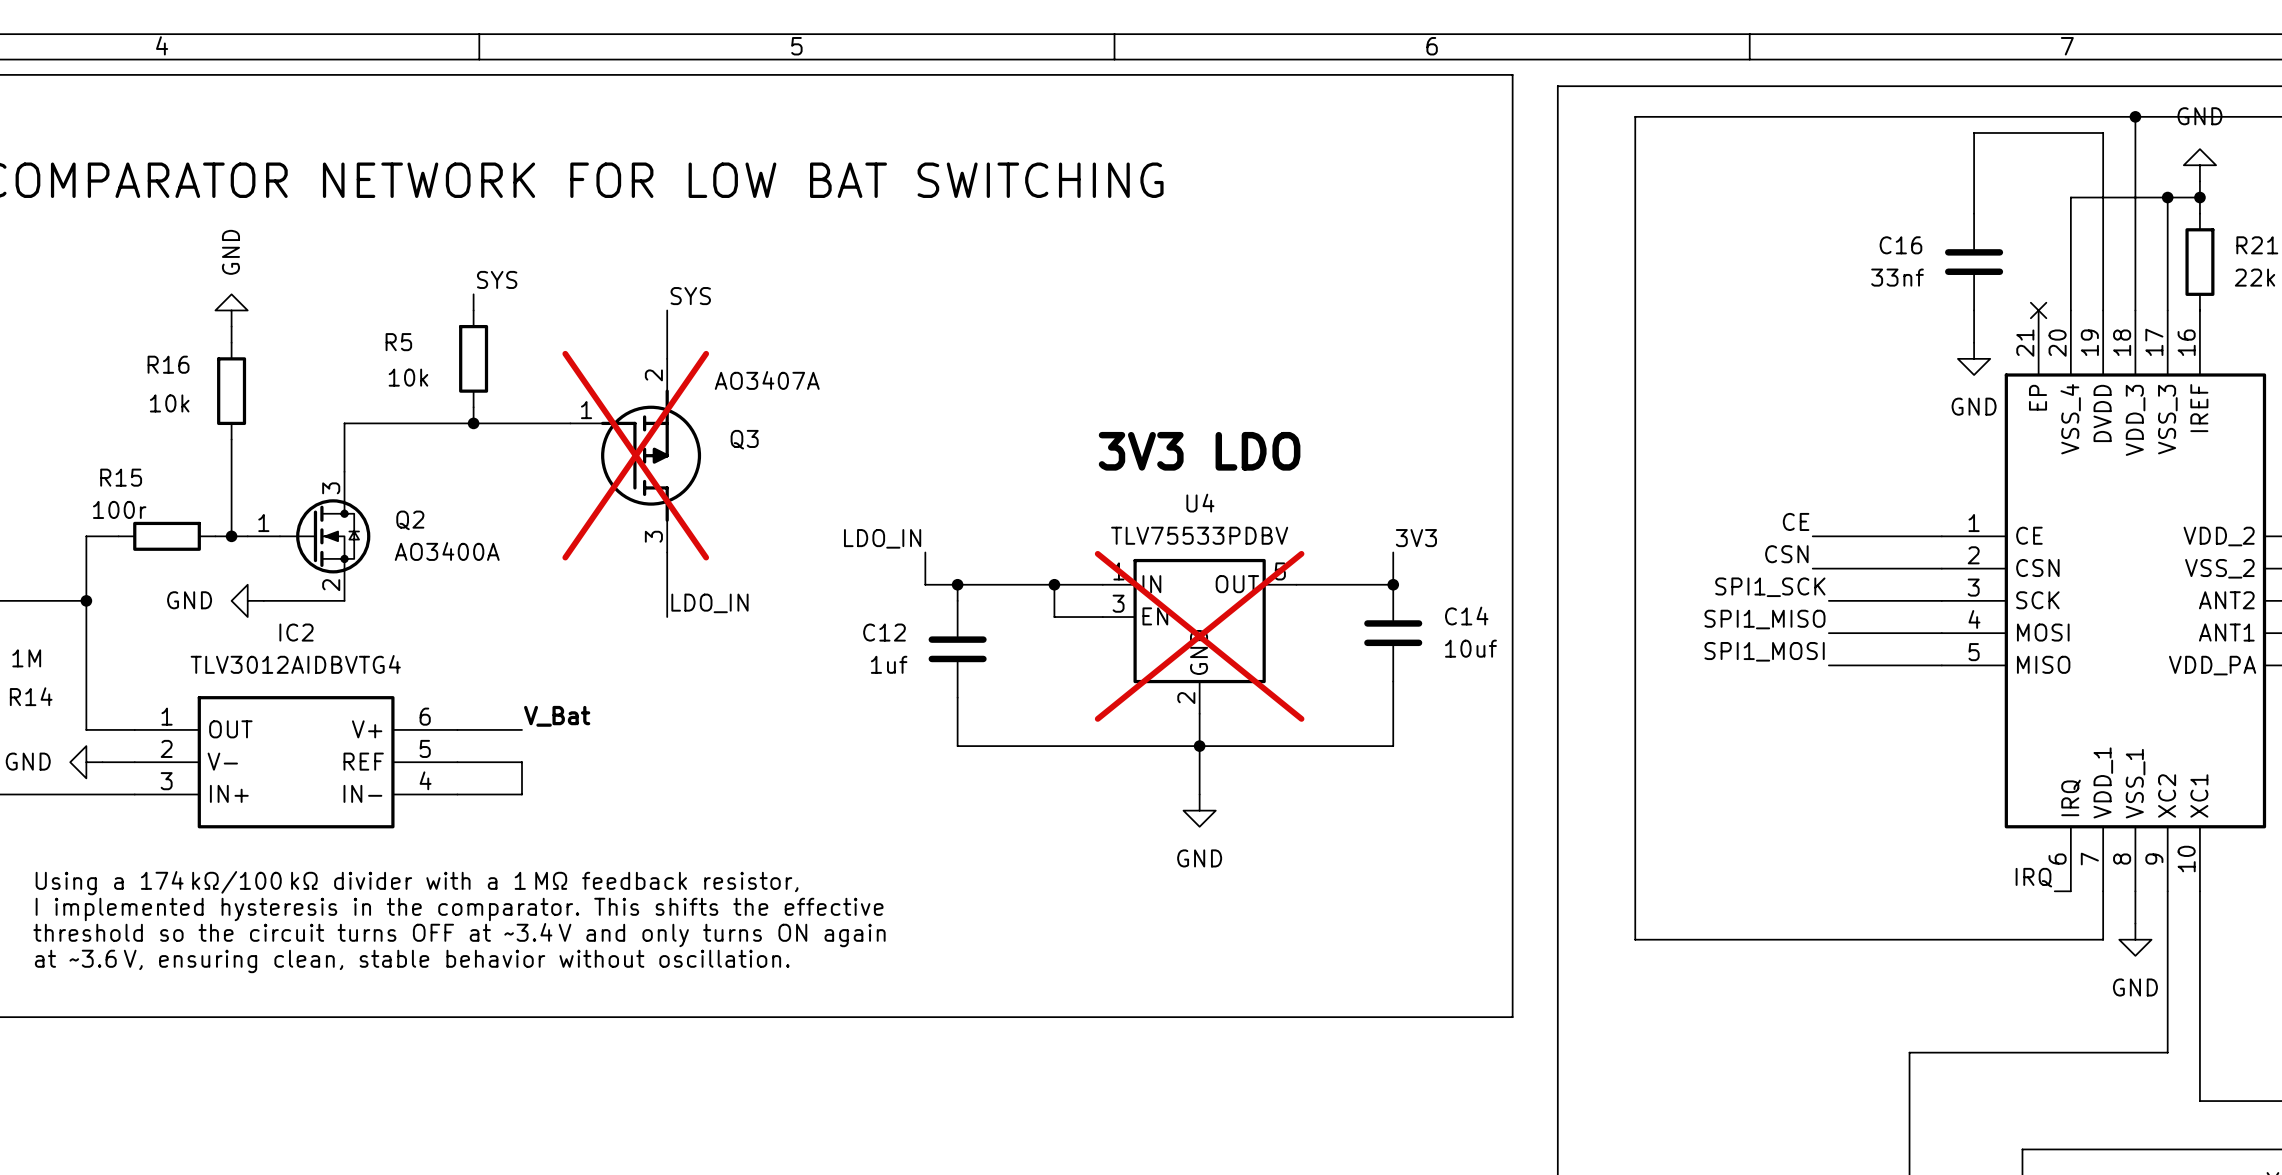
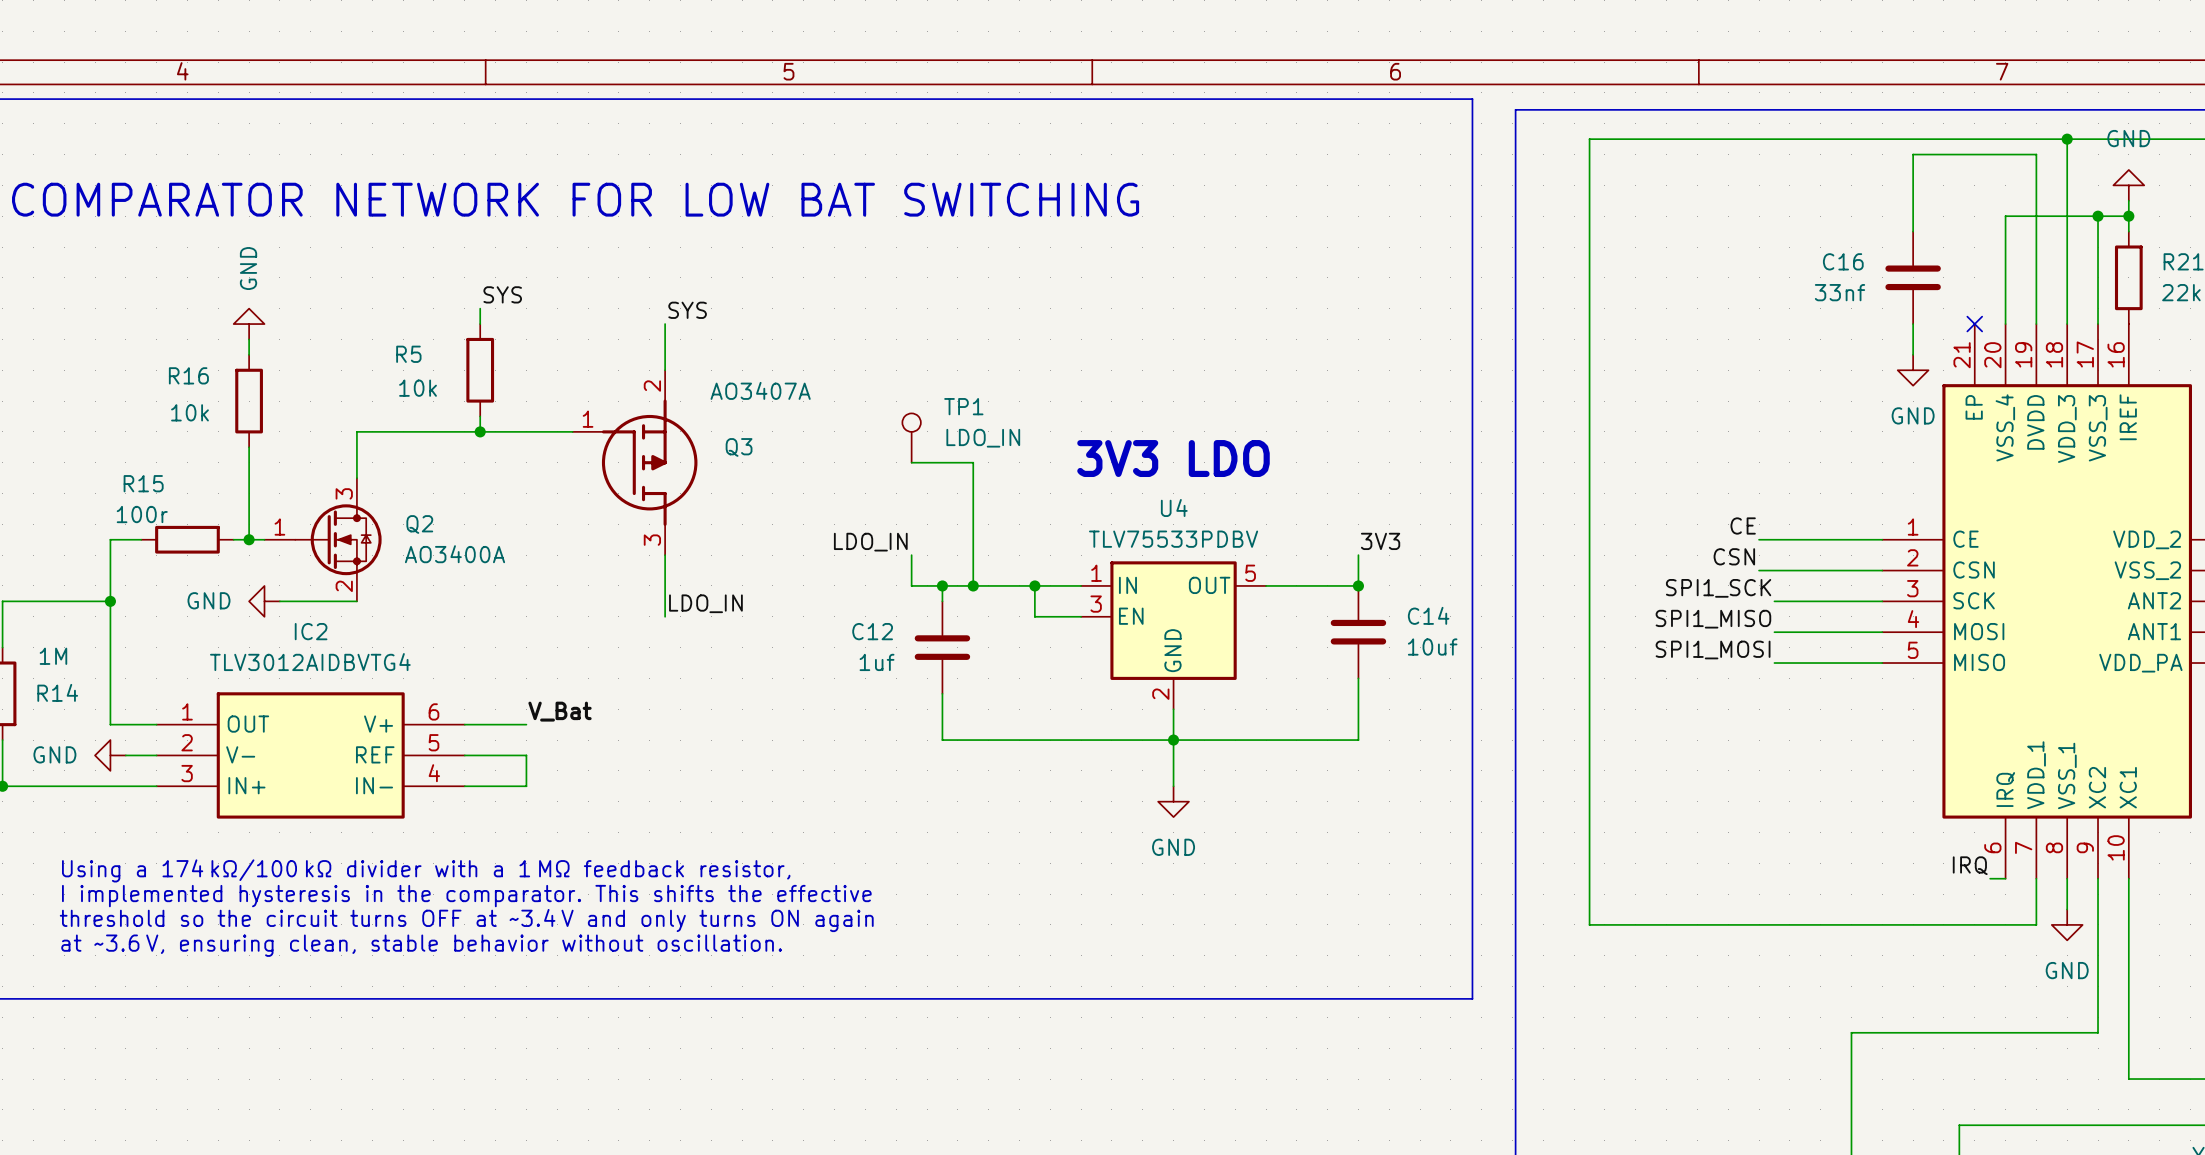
TP1: none -> LDO_IN (911, 438)
Q3 do-not-place cross: (635, 455) -> none
wire: none -> (911, 462) (973, 462) (973, 585)
junction: none -> (973, 585)
U4 do-not-place cross: (1199, 636) -> none

